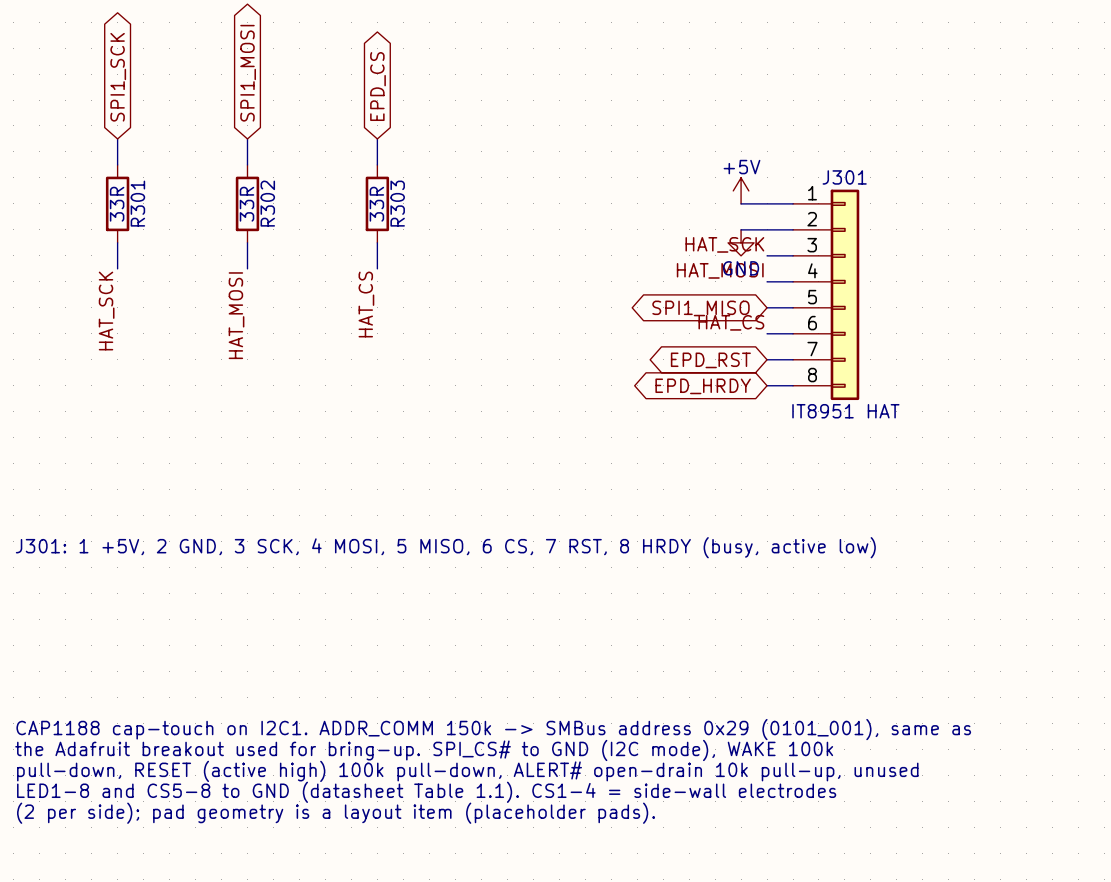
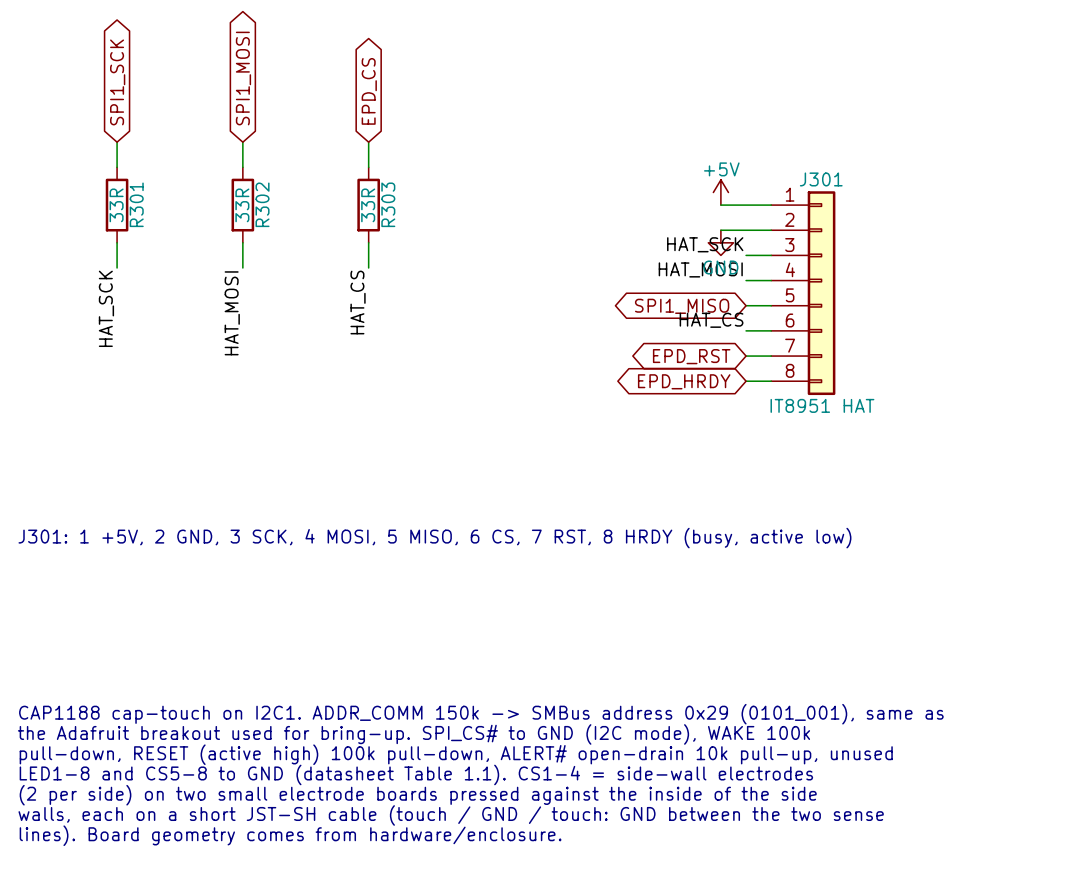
text: (2 per side); pad geometry is a layout item (placeholder pads). (336, 813) -> (2 per side) on two small electrode boards pressed against the inside of the side (418, 795)
text: none -> walls, each on a short JST-SH cable (touch / GND / touch: GND between the two sense (451, 815)
text: none -> lines). Board geometry comes from hardware/enclosure. (290, 835)

